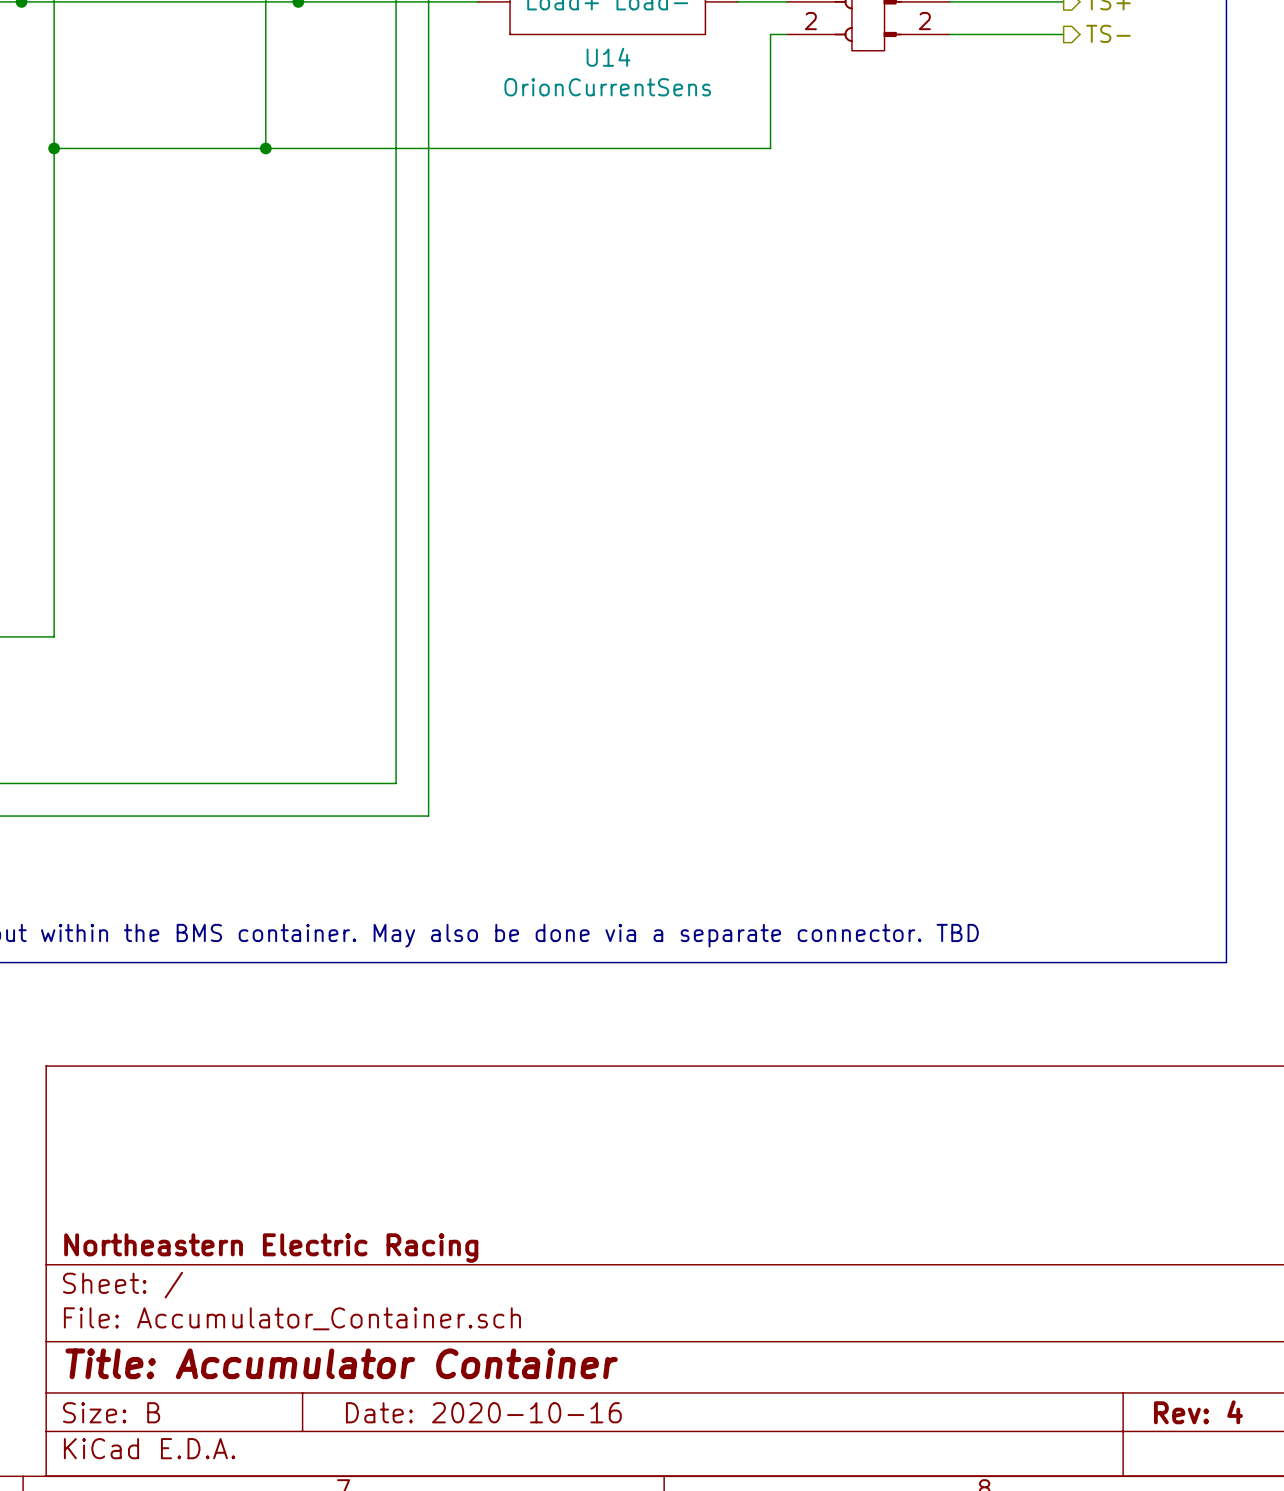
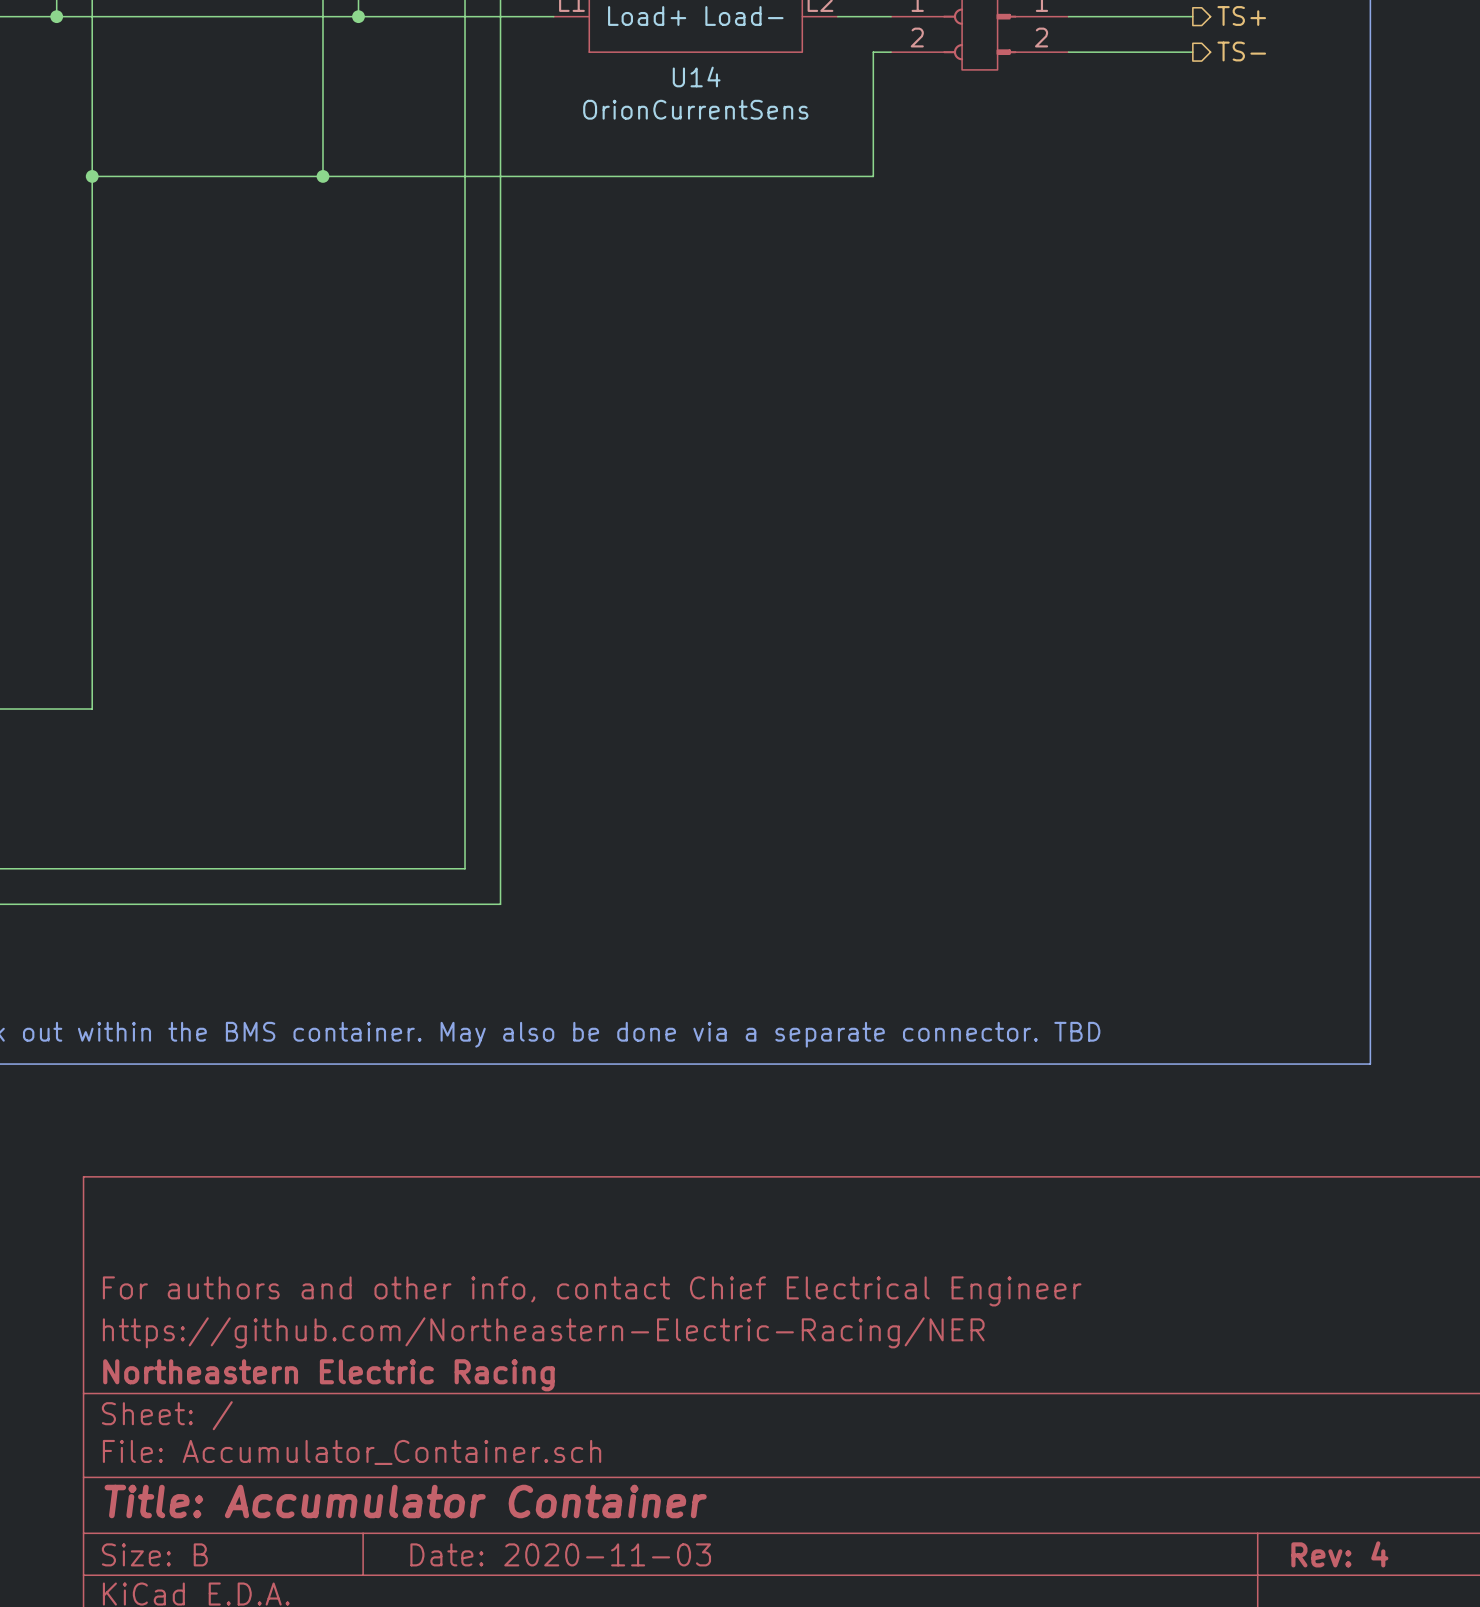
title block: none -> For authors and other info, contact Chief Electrical Engineer (592, 1291)
title block: none -> https://github.com/Northeastern-Electric-Racing/NER (543, 1332)
title block: Date: 2020-10-16 (483, 1412) -> Date: 2020-11-03 (560, 1554)

